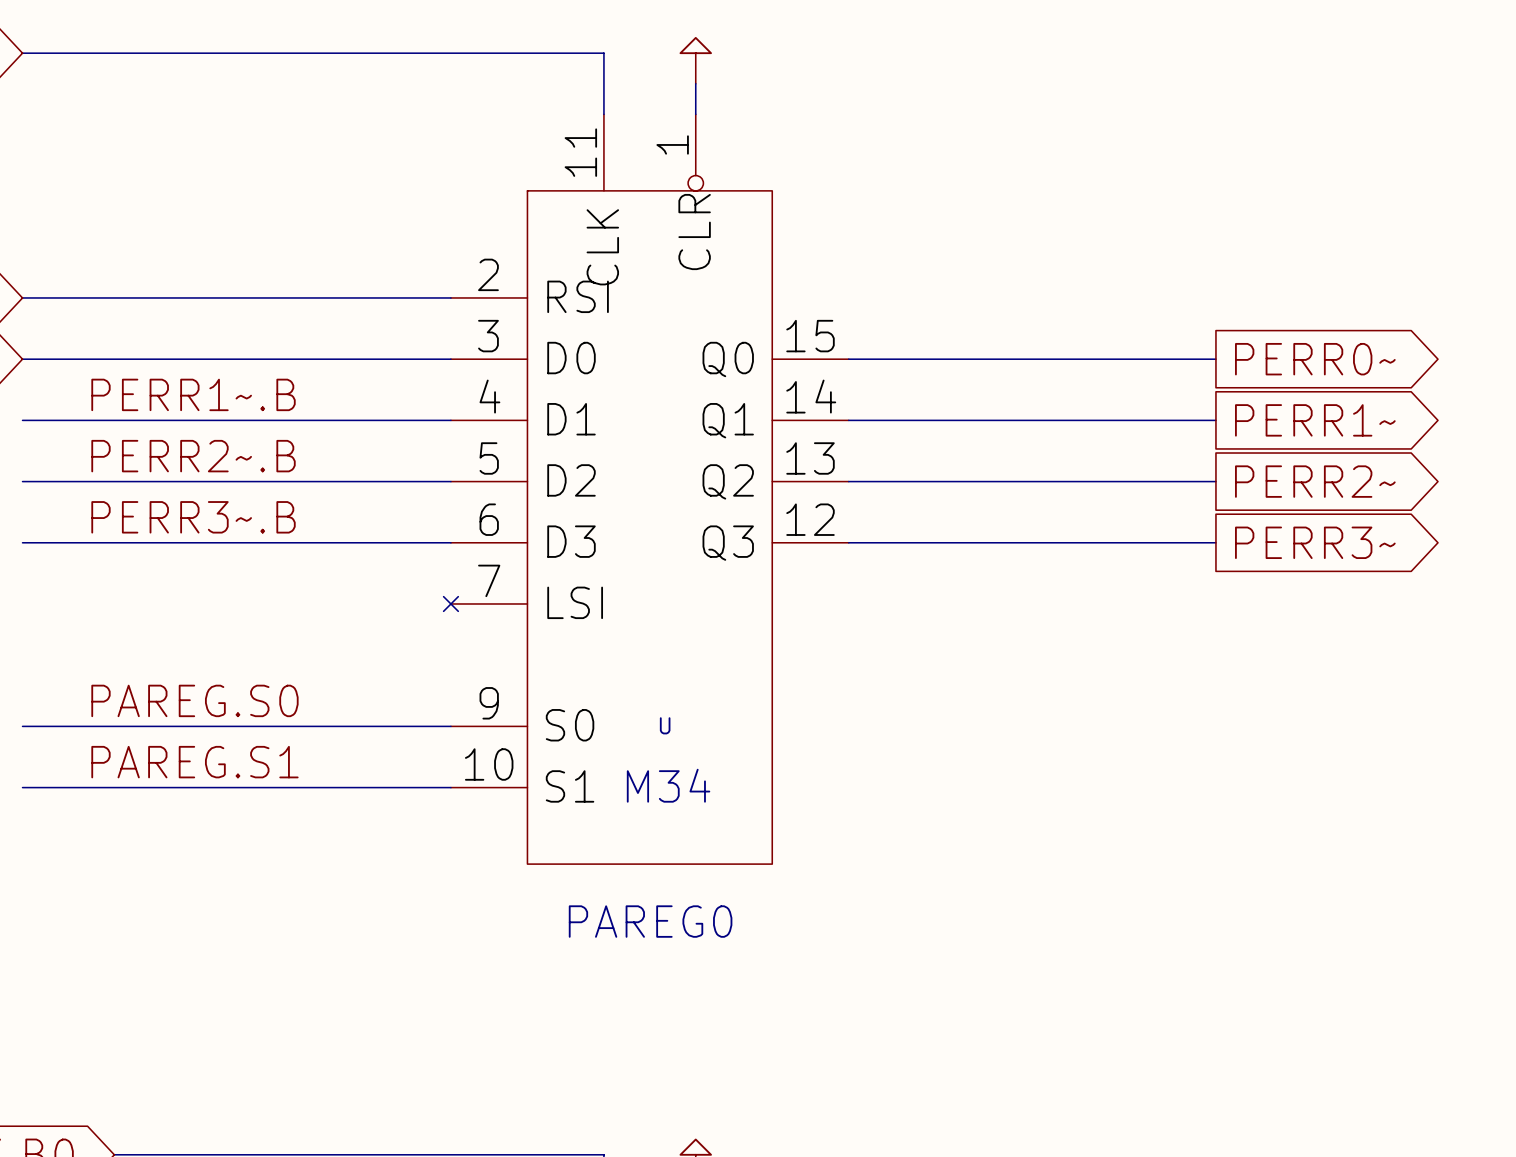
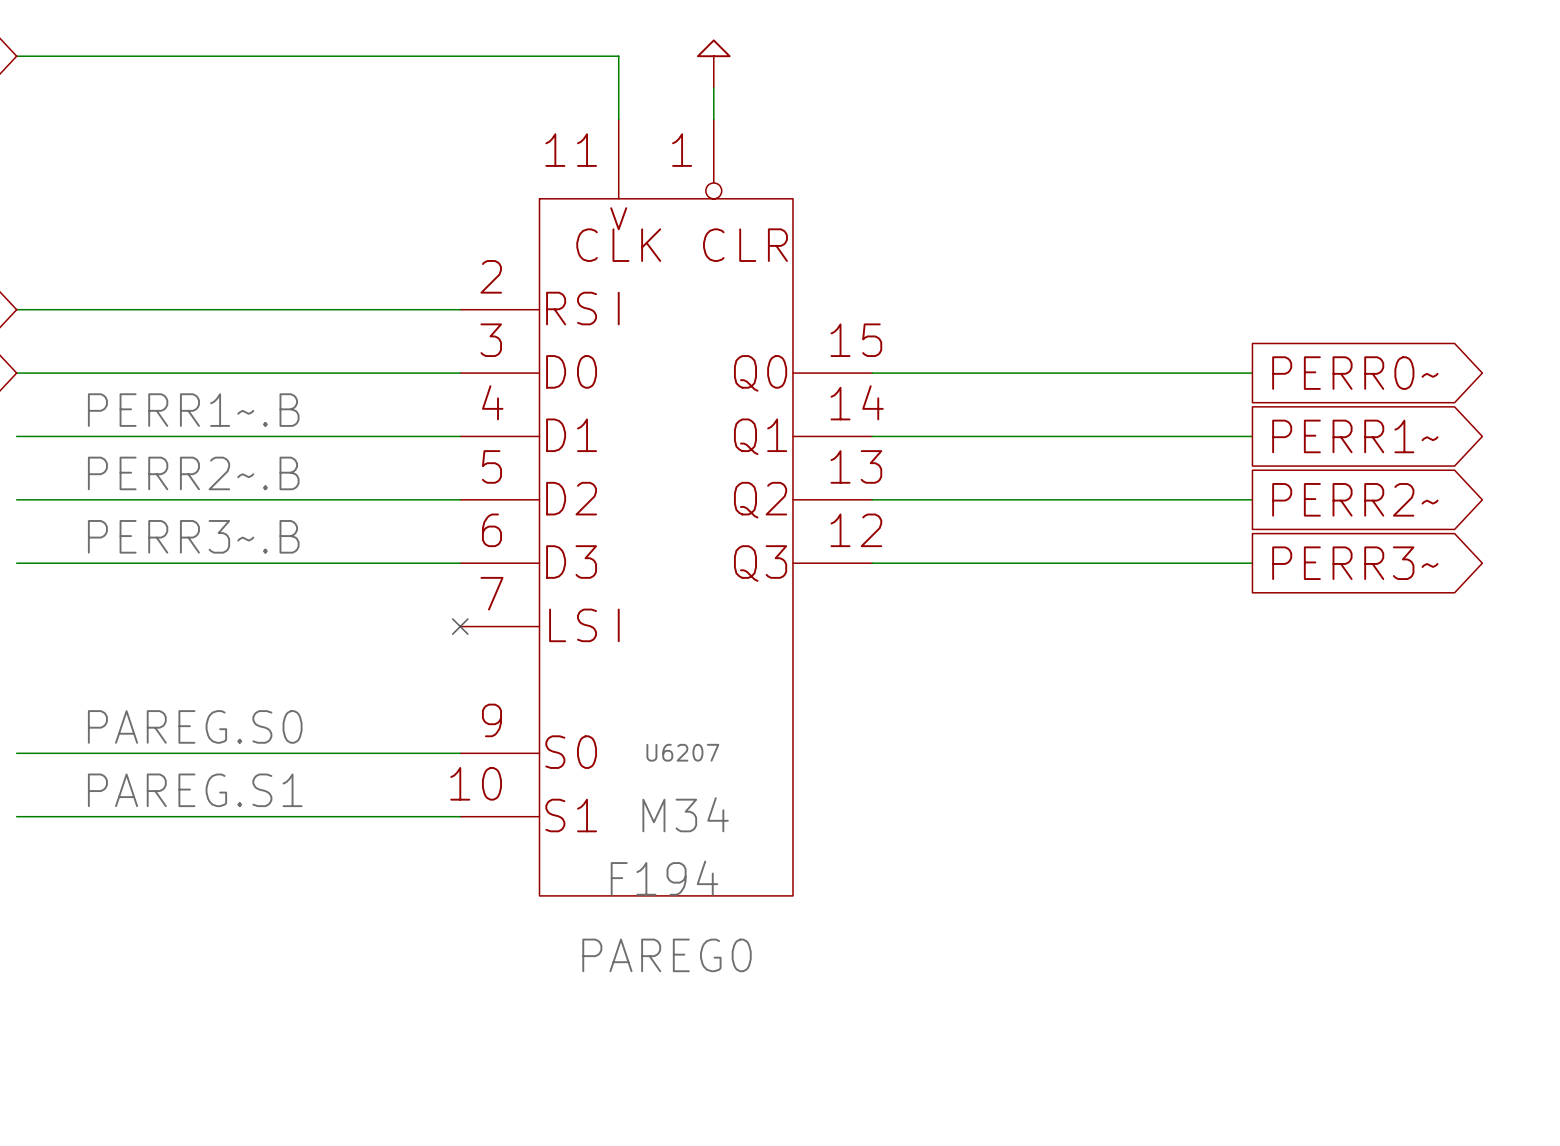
U symbol: [450, 114, 849, 865] -> [460, 119, 873, 896]
U name: U (665, 725) -> U6207 (682, 752)
U value: none -> F194 (664, 878)

